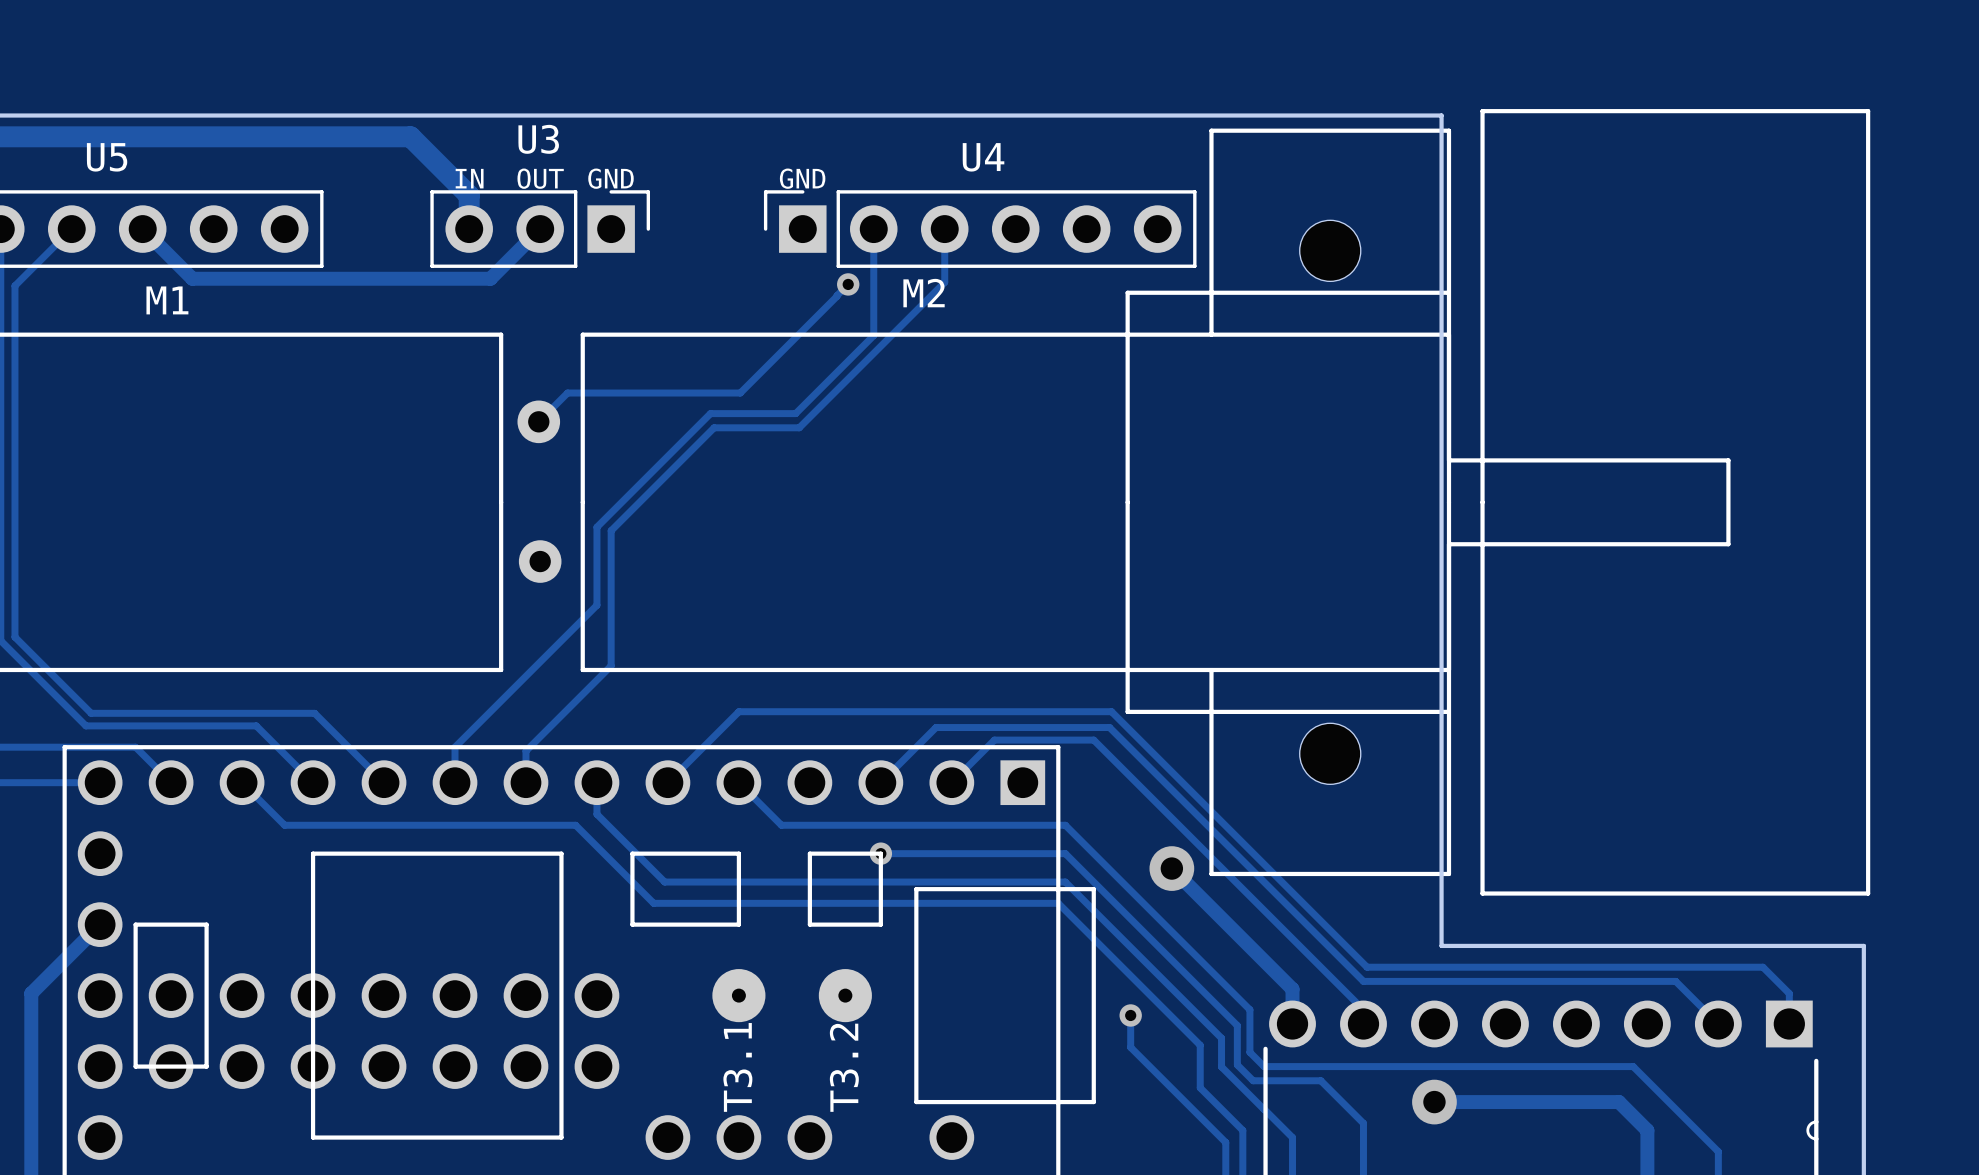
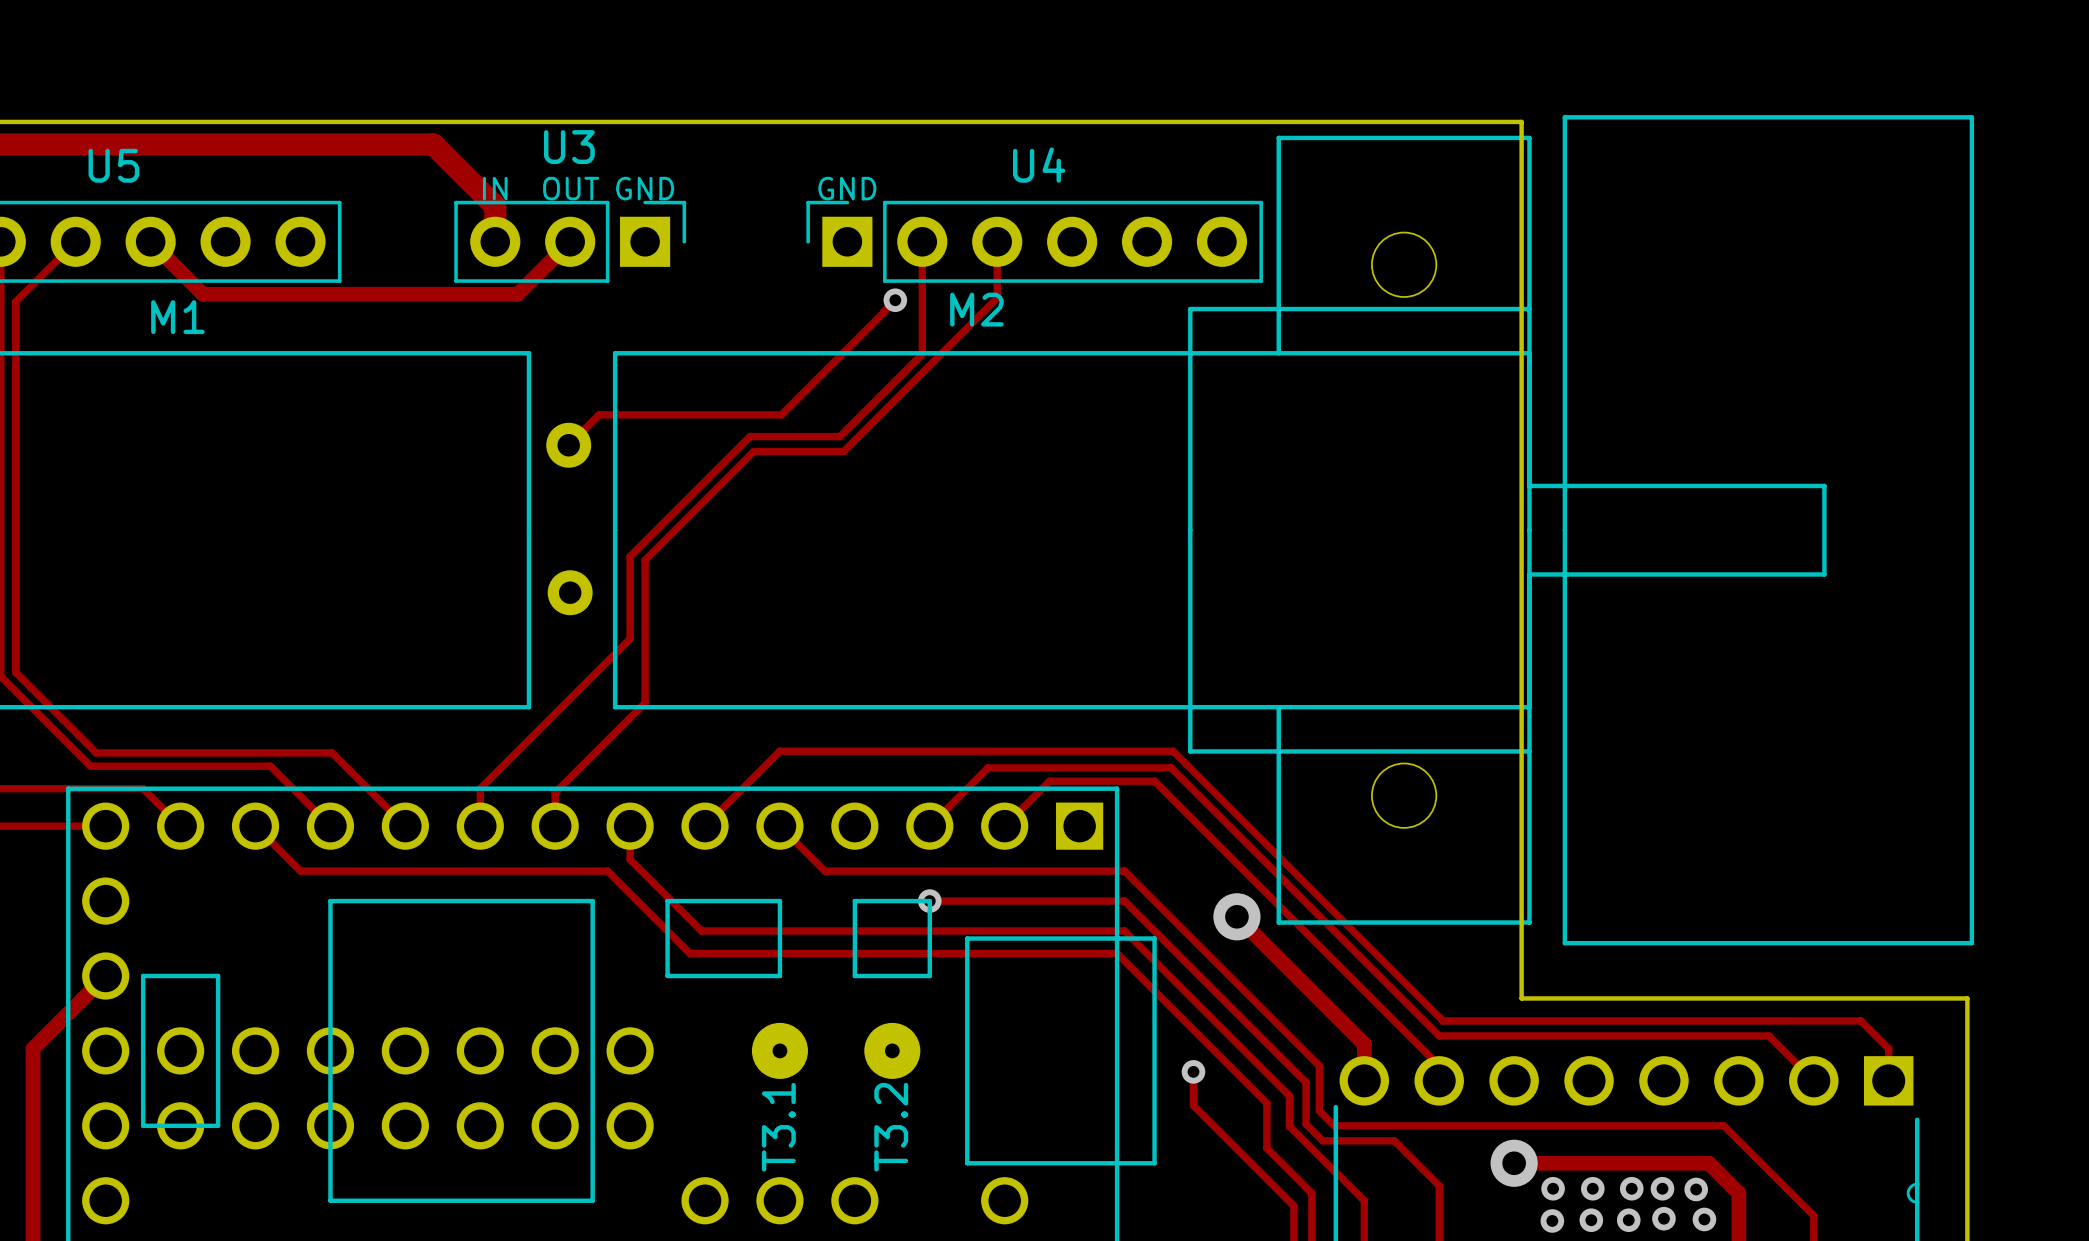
via: none -> (1553, 1188)
via: none -> (1592, 1188)
via: none -> (1631, 1188)
via: none -> (1662, 1188)
via: none -> (1696, 1189)
via: none -> (1663, 1218)
via: none -> (1704, 1219)
via: none -> (1552, 1220)
via: none -> (1591, 1220)
via: none -> (1628, 1220)

